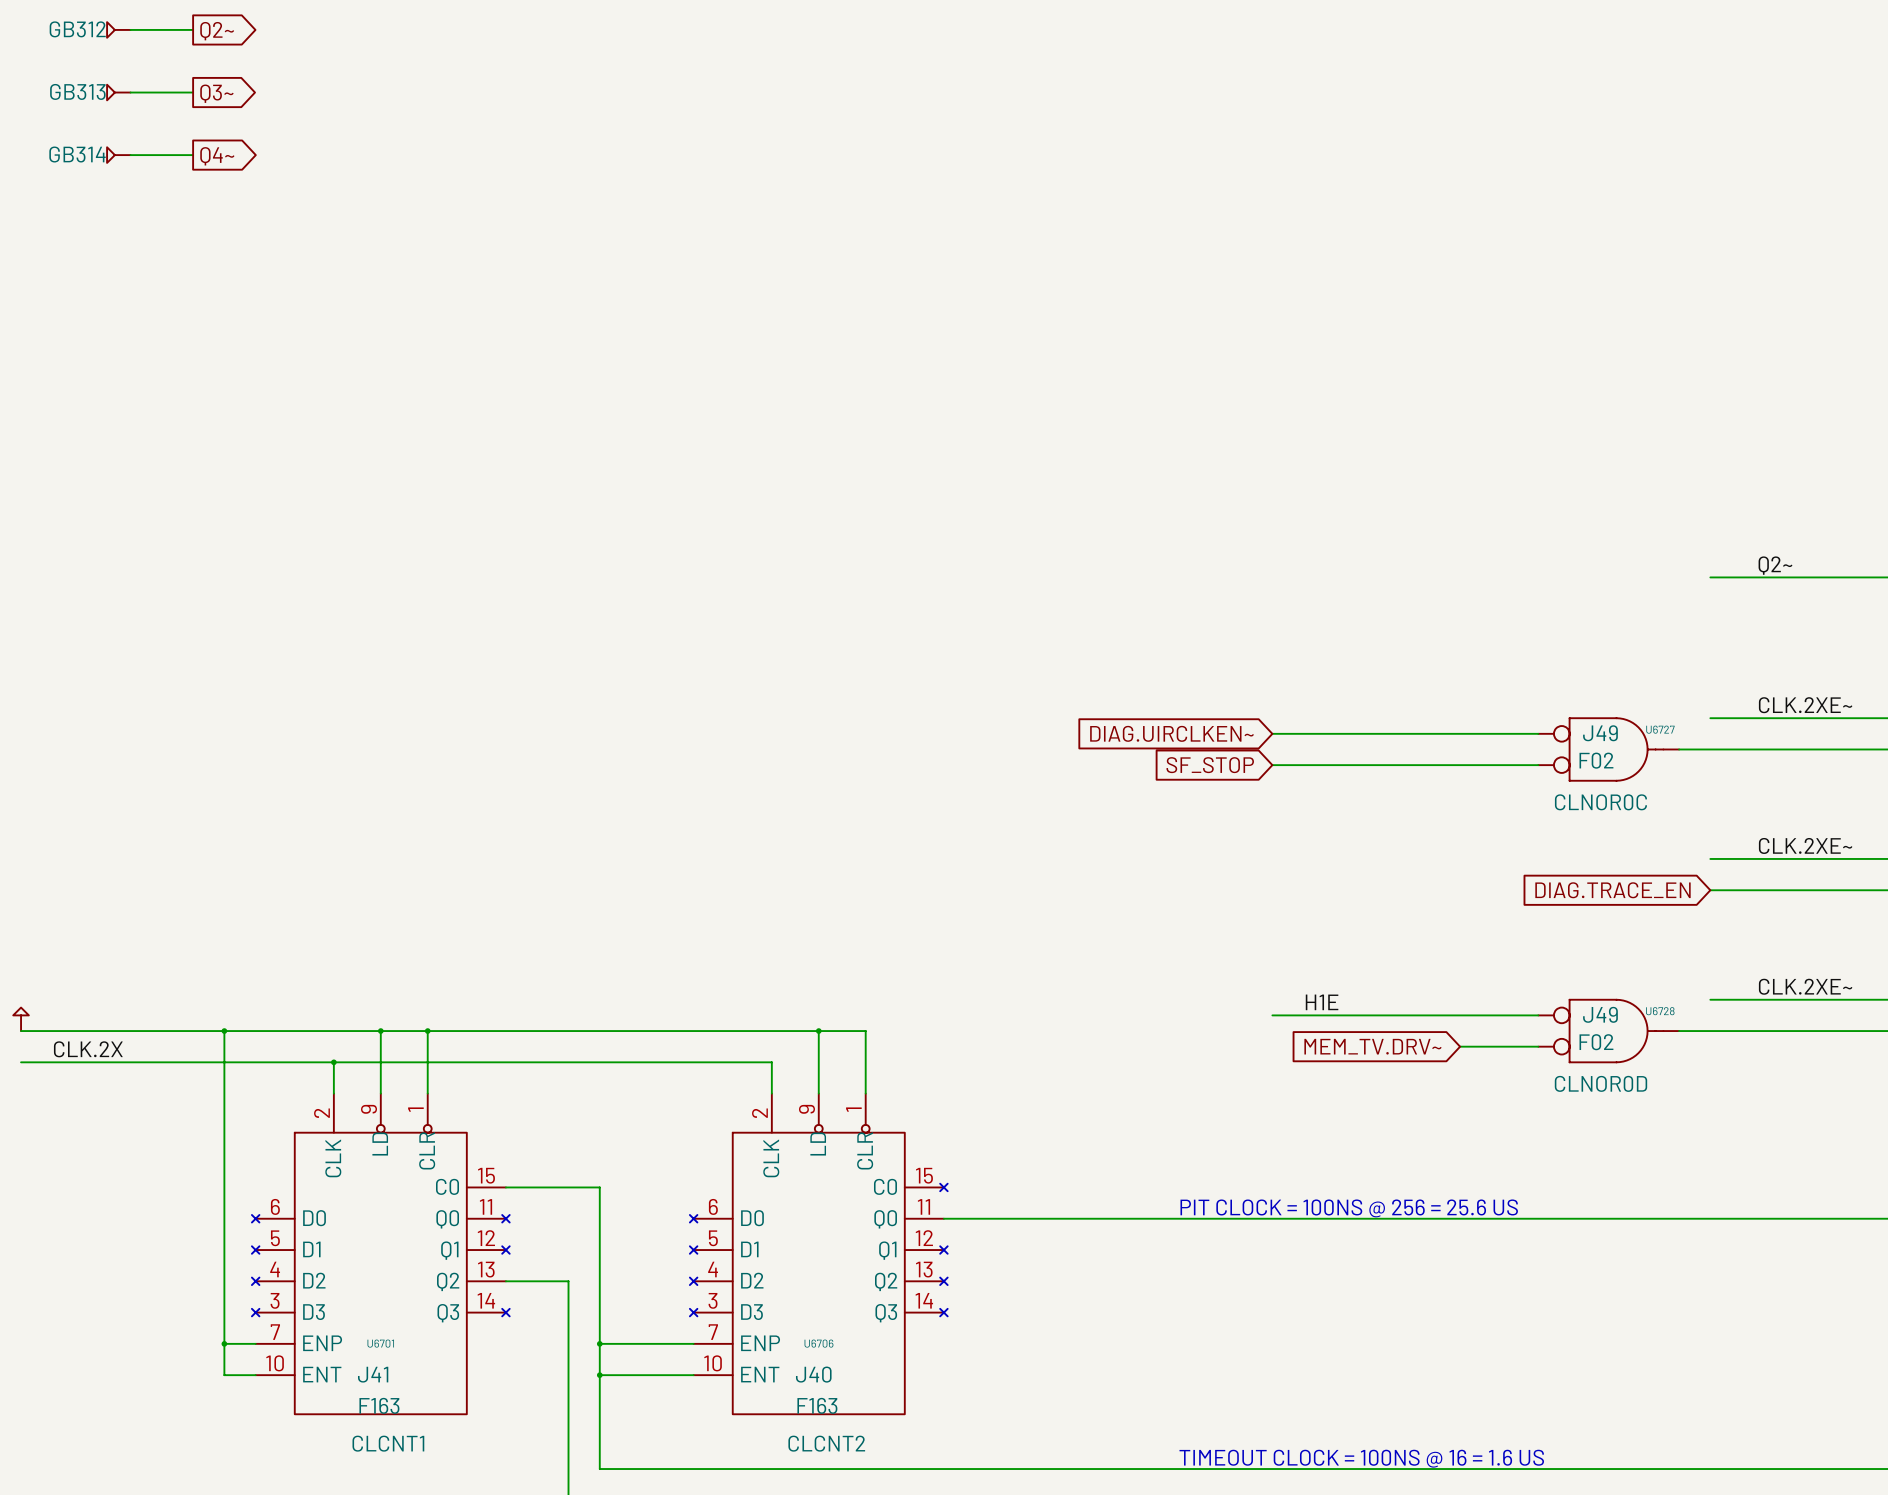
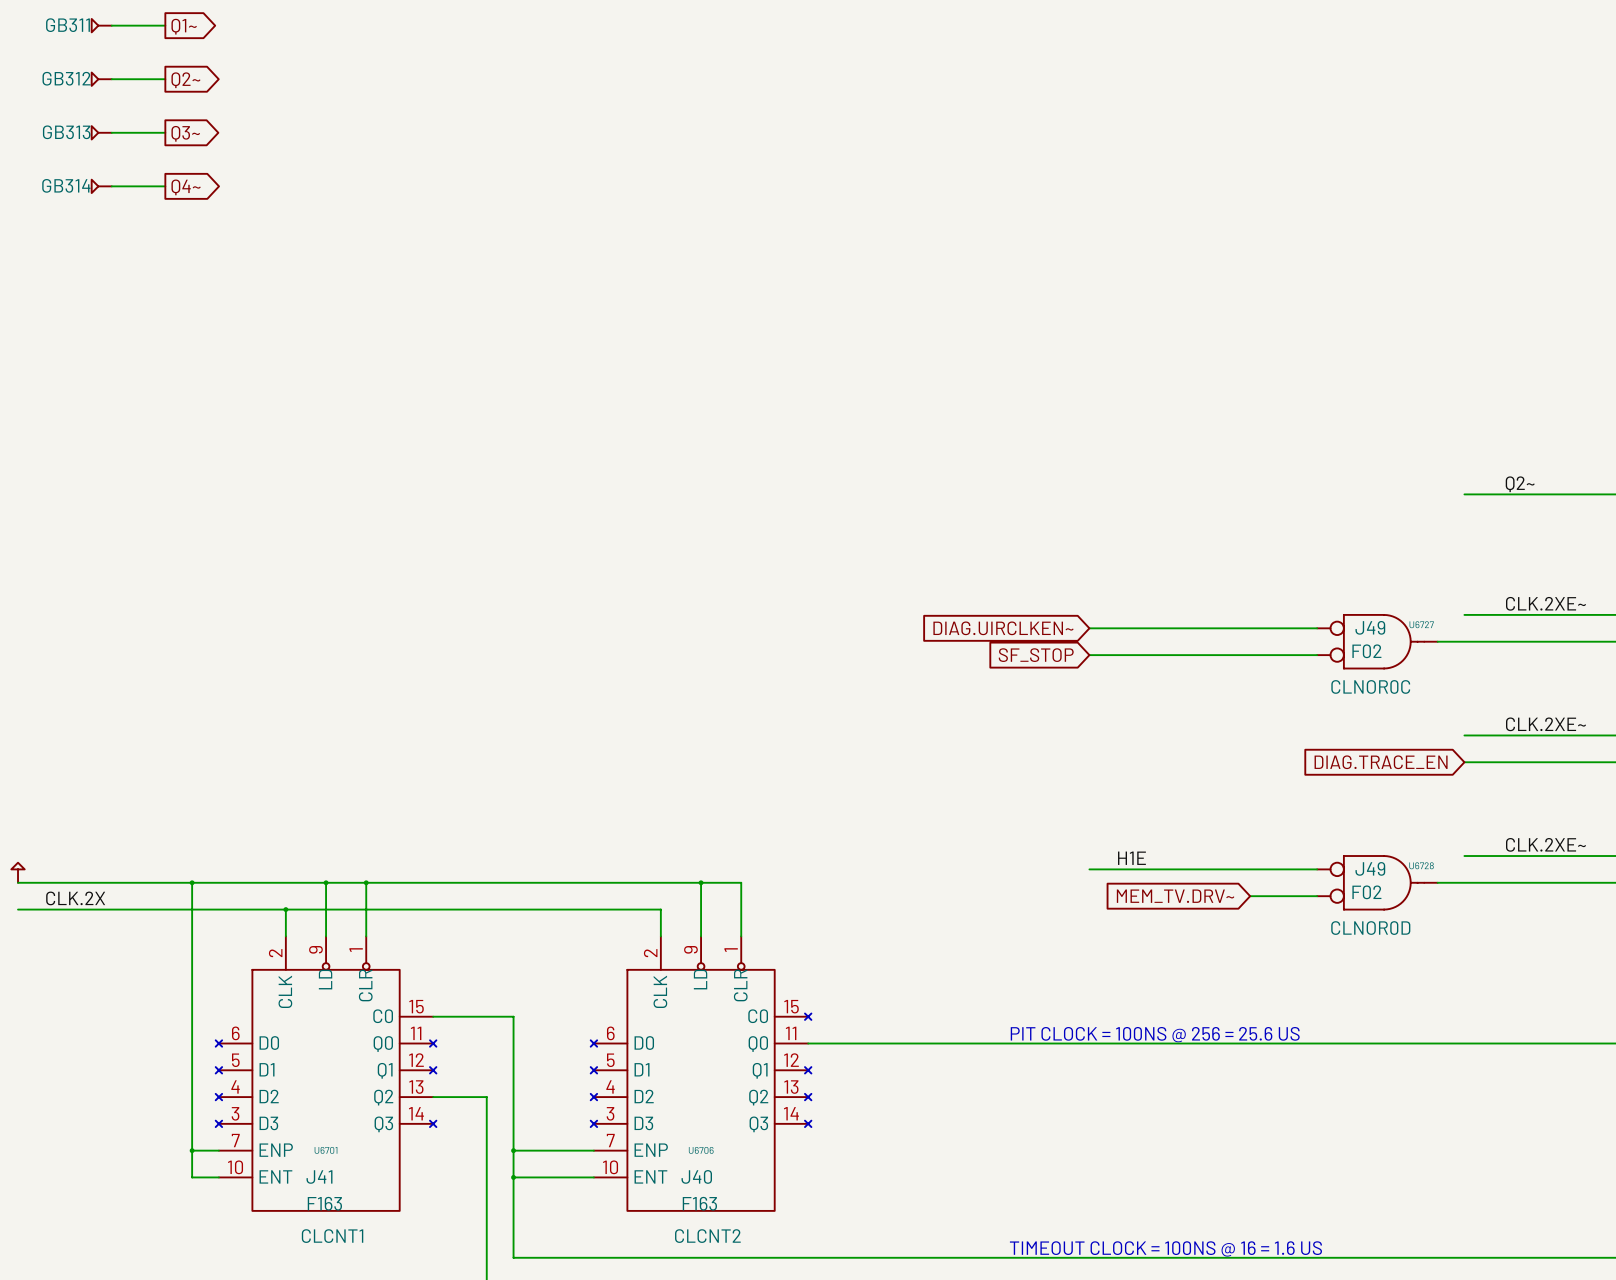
GB312 name: GB312 (77, 29) -> GB311 (67, 25)
global label: Q2~ (217, 31) -> Q1~ (184, 26)
GB313 name: GB313 (77, 91) -> GB312 (66, 78)
global label: Q3~ (216, 93) -> Q2~ (185, 80)
GB314 name: GB314 (77, 154) -> GB313 (66, 132)
global label: Q4~ (217, 156) -> Q3~ (185, 133)
GB314: none -> (101, 186)
wire: none -> (111, 186) (165, 186)
global label: none -> Q4~ (186, 187)

